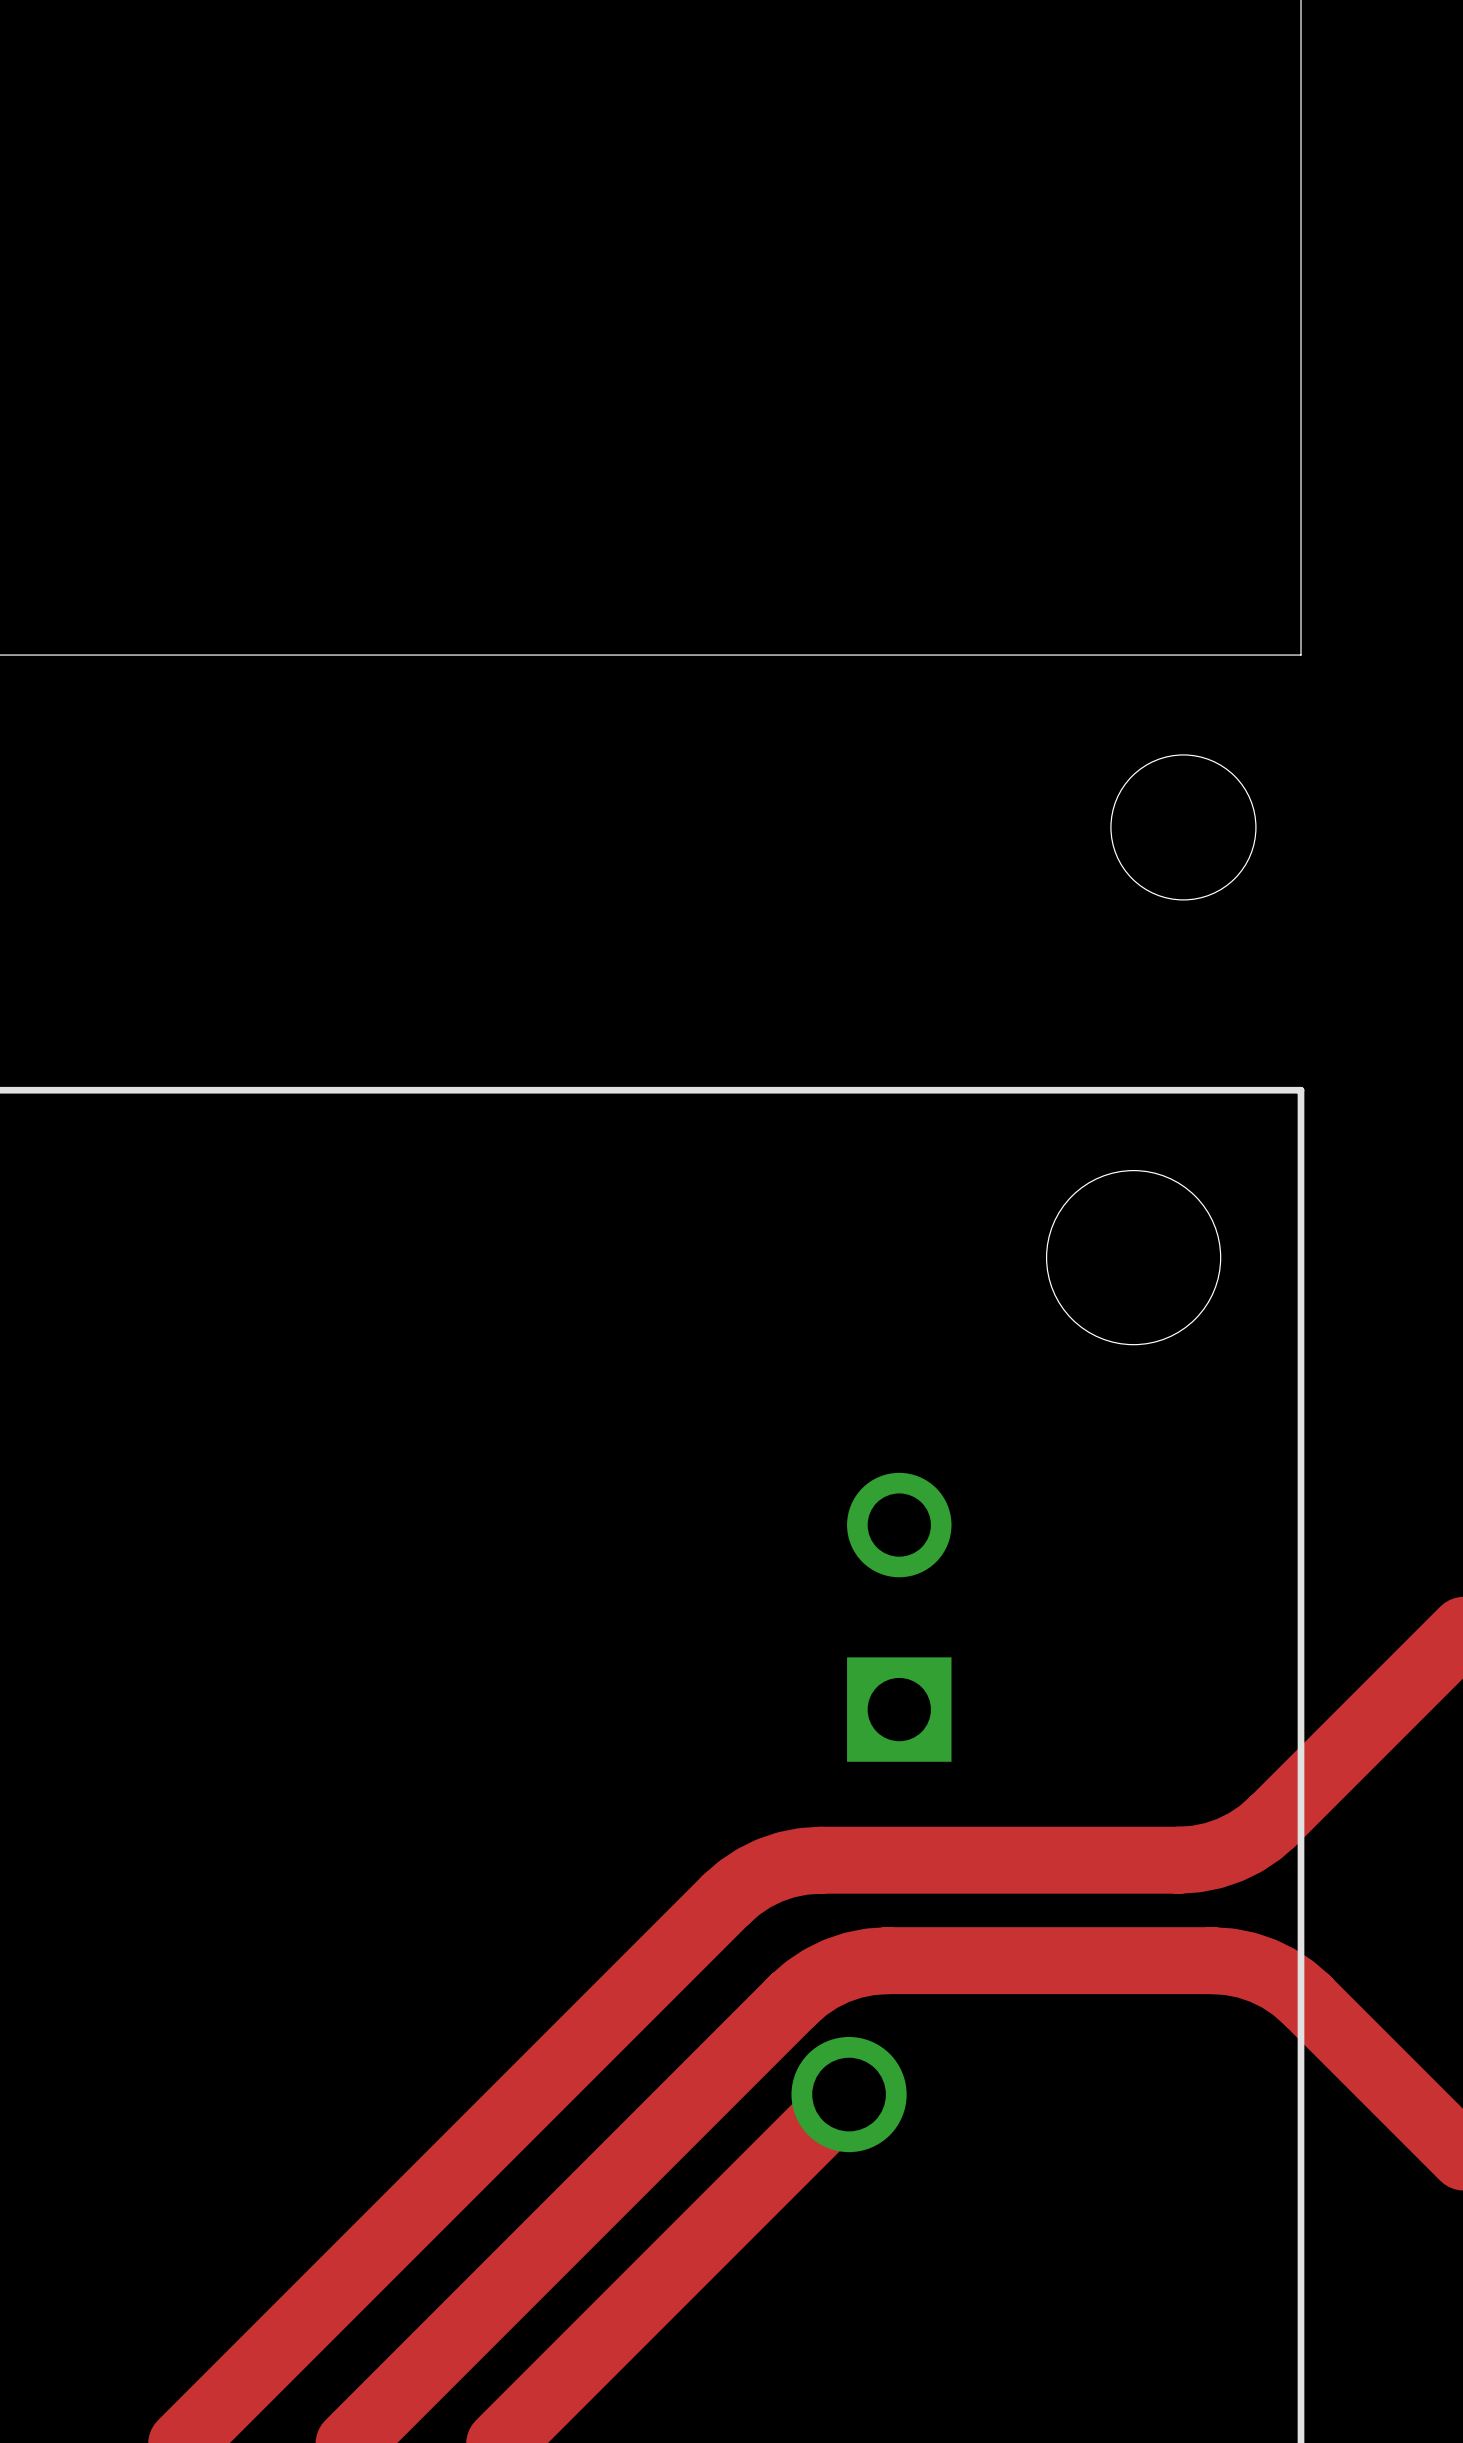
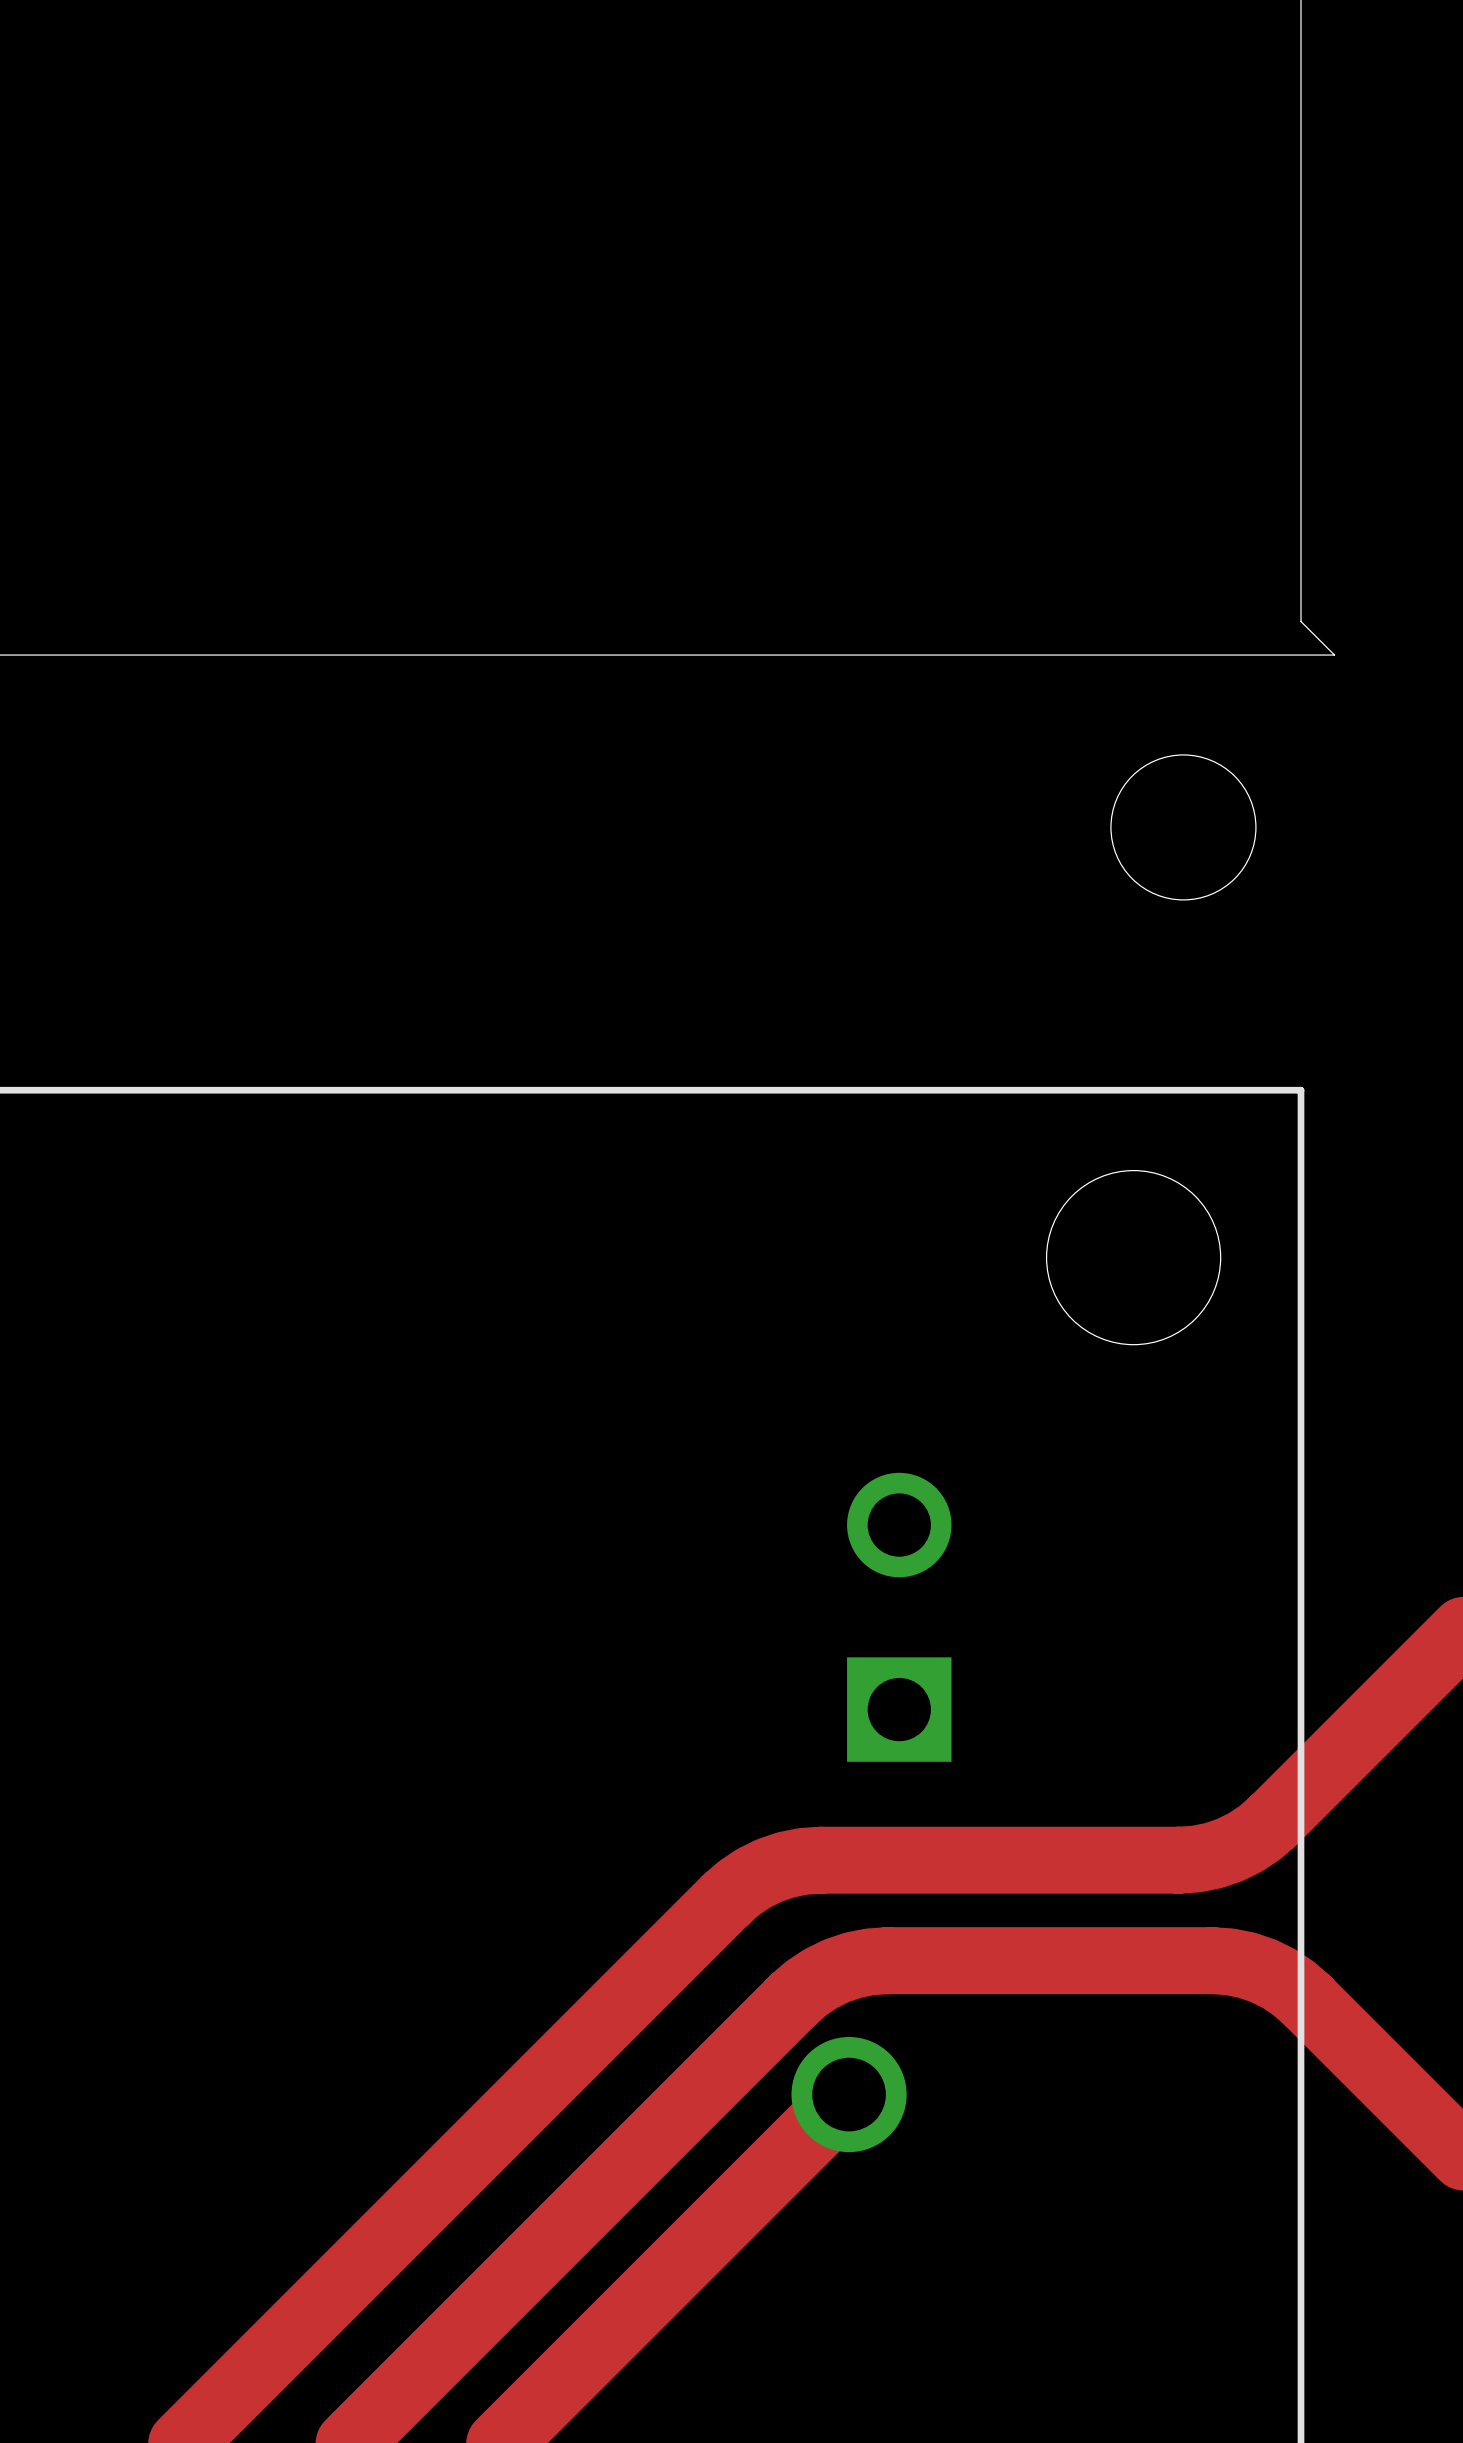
board edge: (1301, 621) (1301, 655) -> (1301, 621) (1334, 655) (1301, 655)

